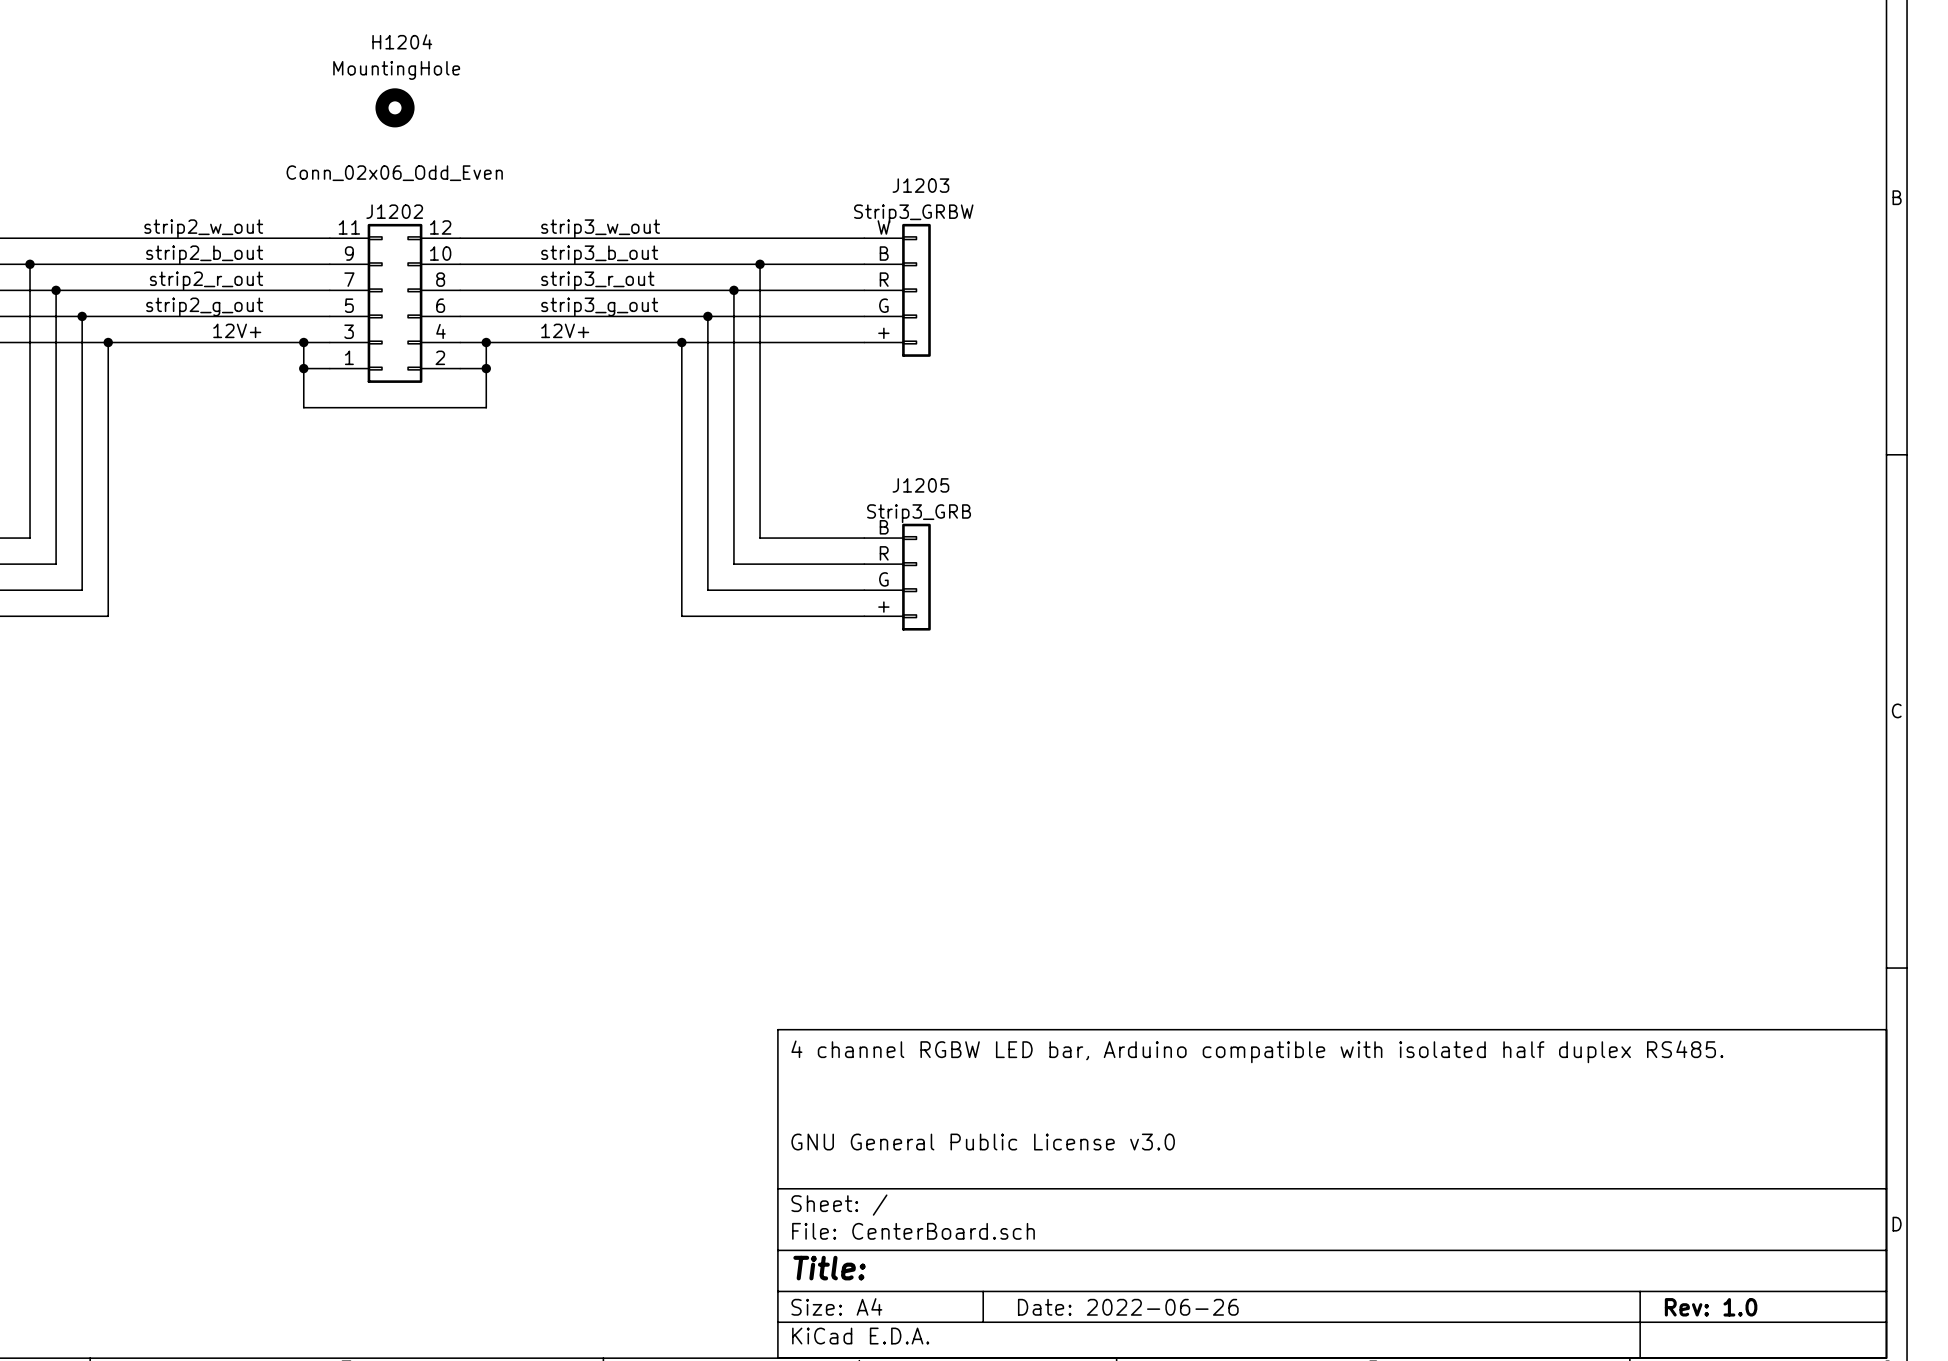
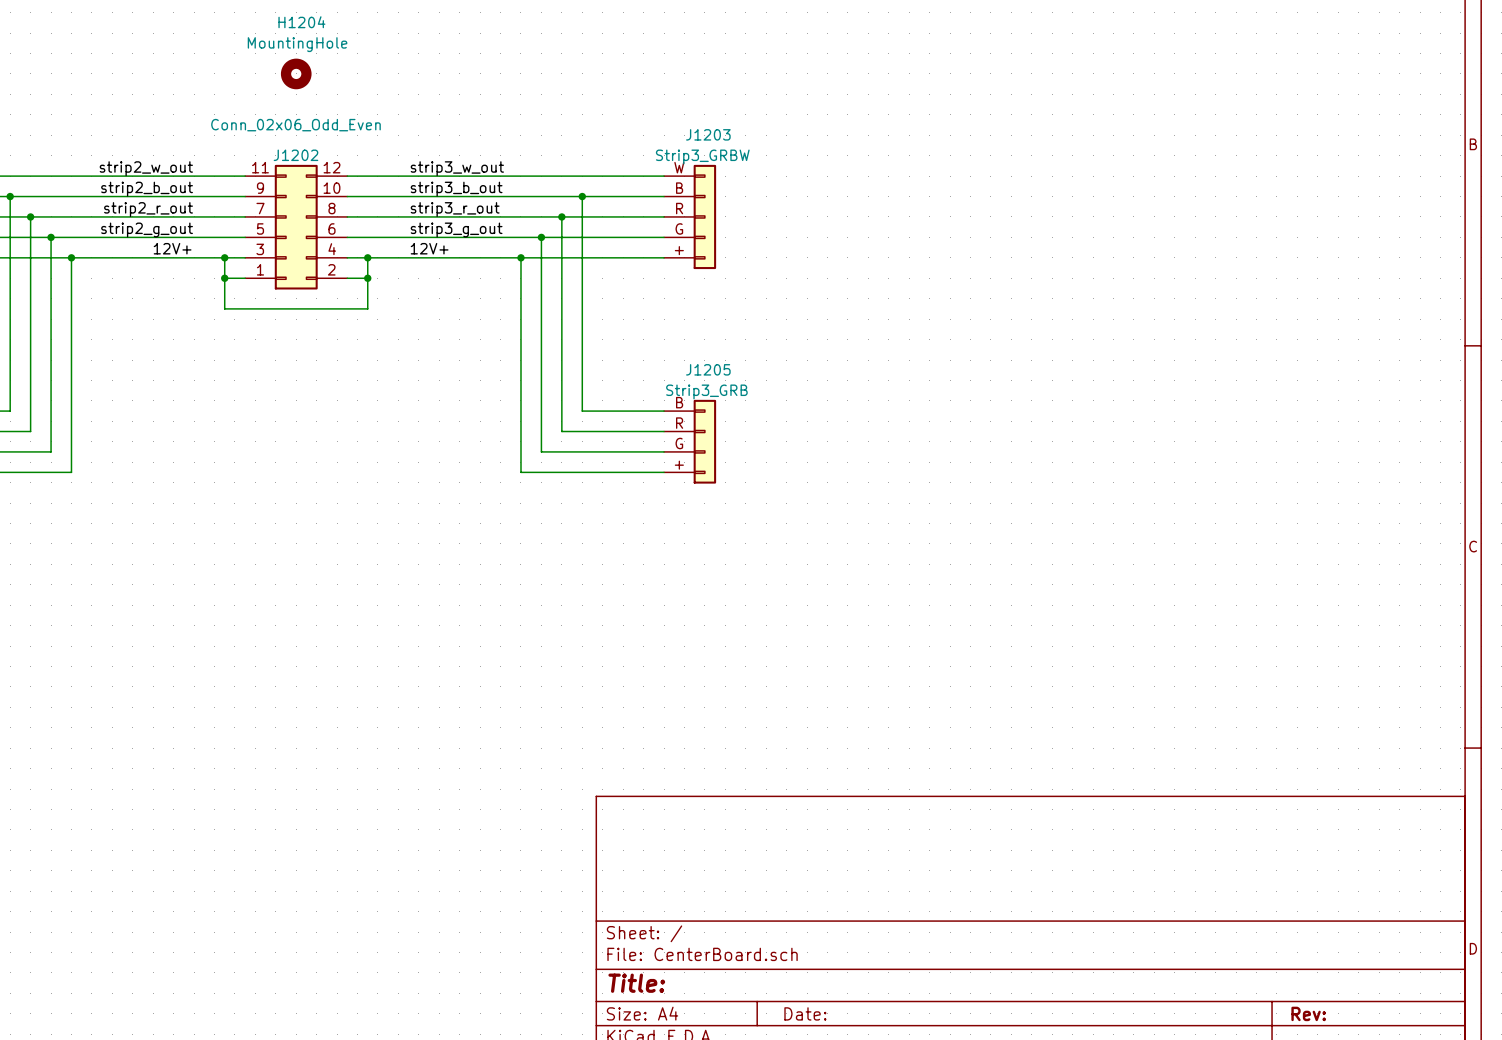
title block: 4 channel RGBW LED bar, Arduino compatible with isolated half duplex RS485. (1257, 1051) -> none
title block: GNU General Public License v3.0 (983, 1142) -> none
title block: Date: 2022-06-26 (1128, 1307) -> Date: (805, 1013)
title block: Rev: 1.0 (1711, 1307) -> Rev: (1308, 1013)

